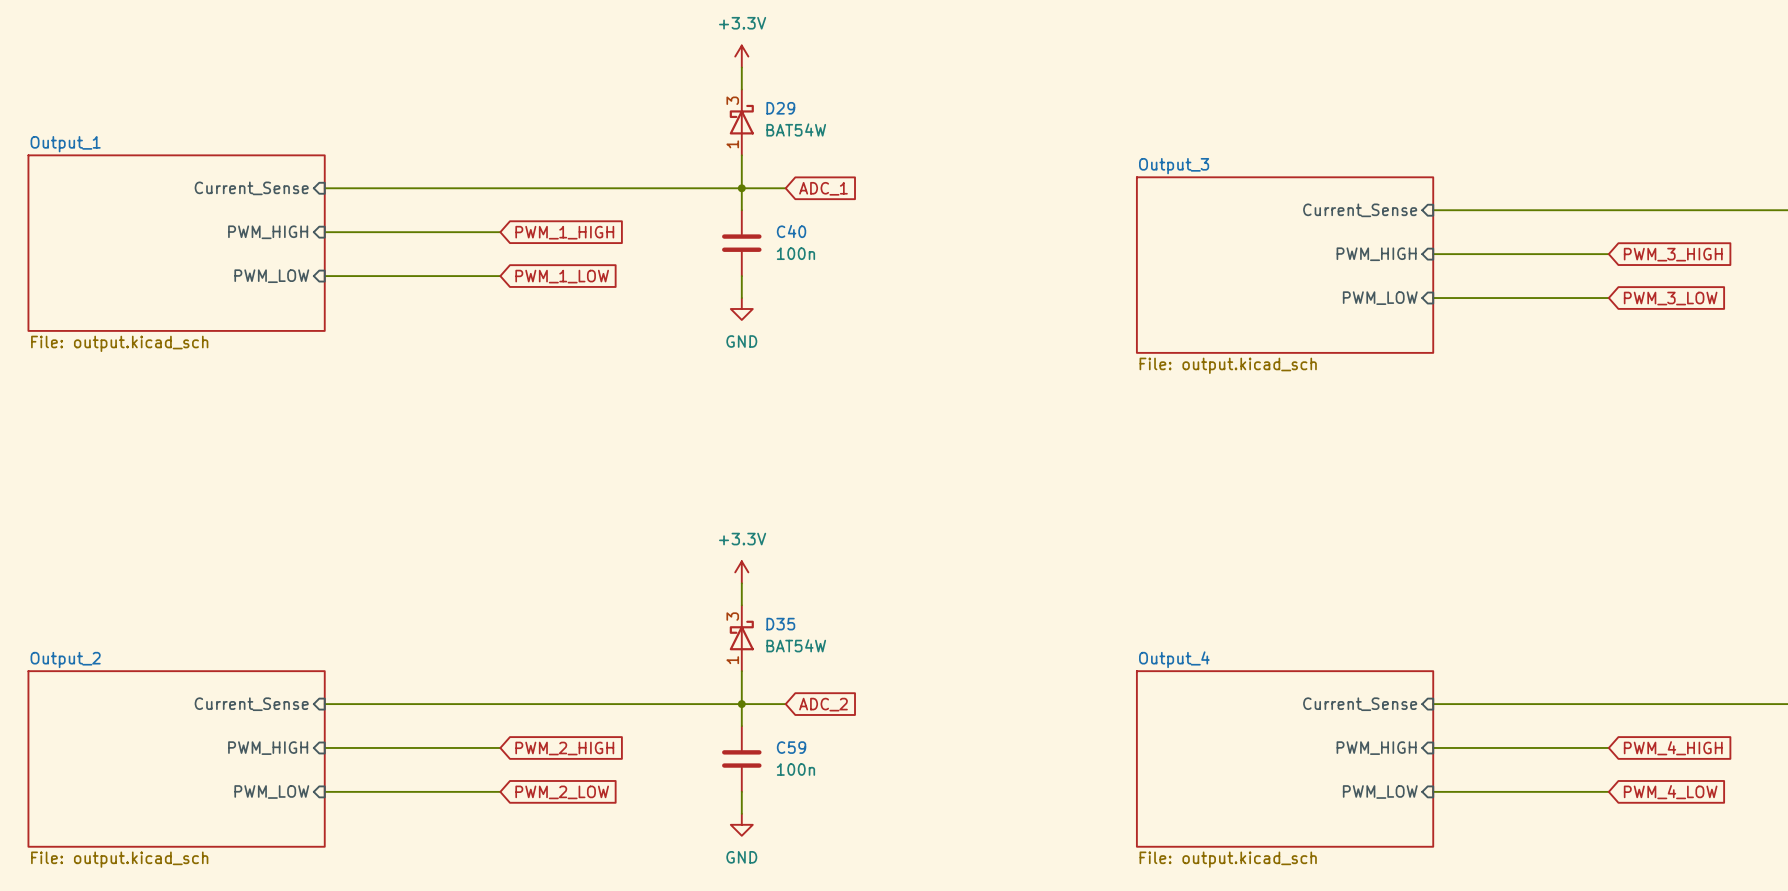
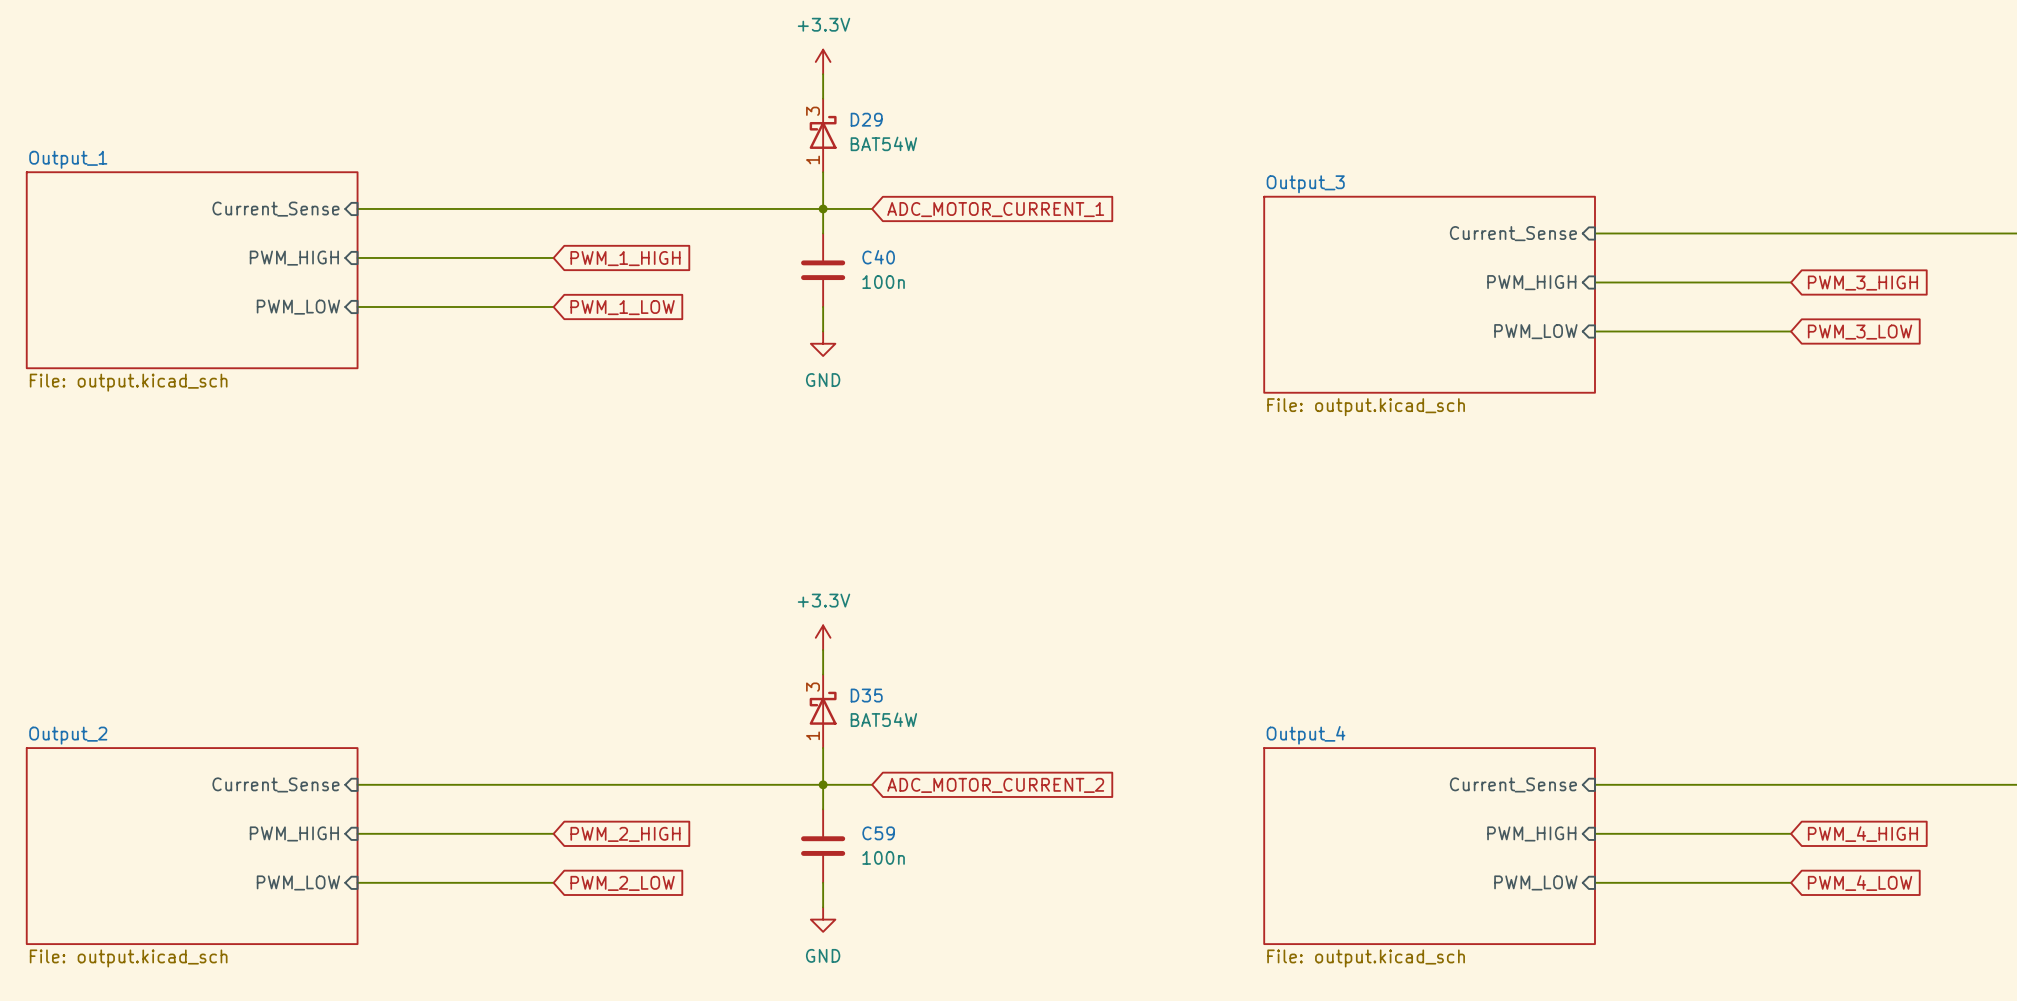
global label: ADC_1 (823, 188) -> ADC_MOTOR_CURRENT_1 (995, 209)
global label: ADC_2 (823, 704) -> ADC_MOTOR_CURRENT_2 (995, 785)

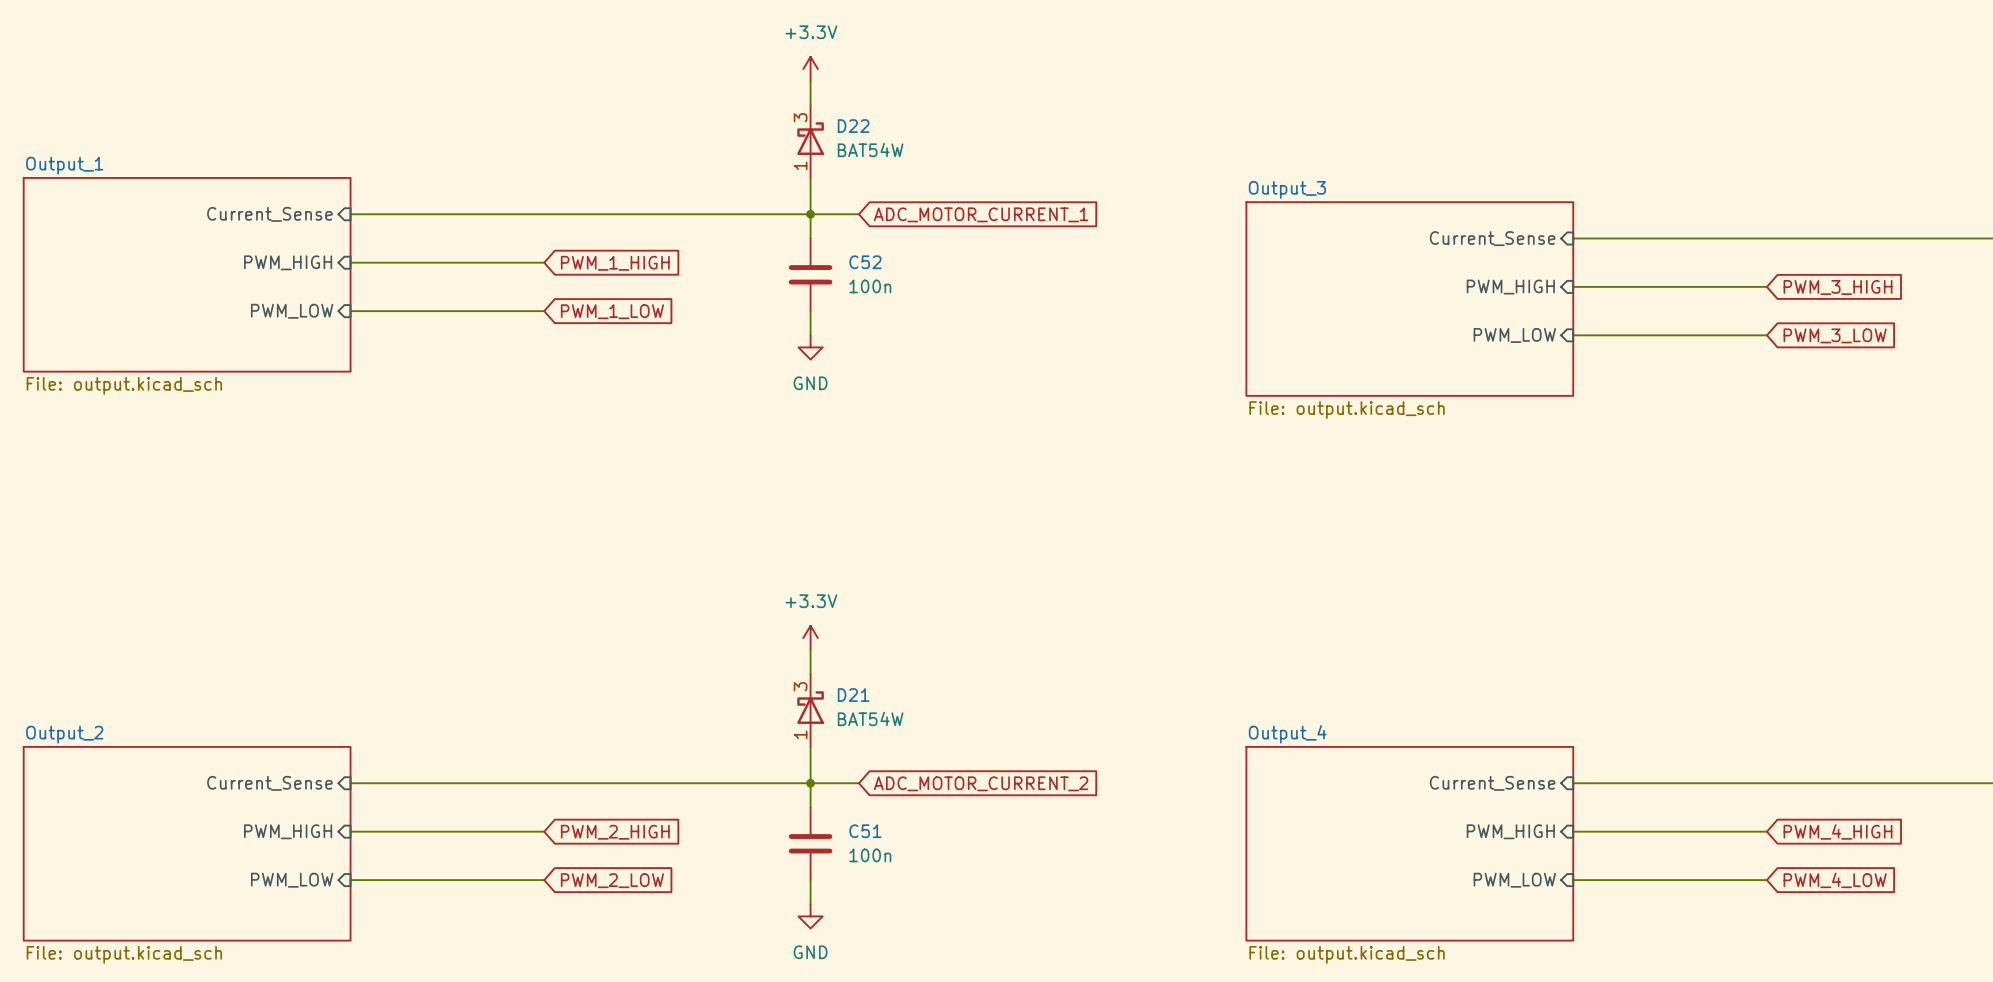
D29 name: D29 (866, 119) -> D22 (853, 126)
C40 name: C40 (878, 257) -> C52 (865, 262)
D35 name: D35 (866, 695) -> D21 (853, 695)
C59 name: C59 (878, 833) -> C51 (865, 831)

